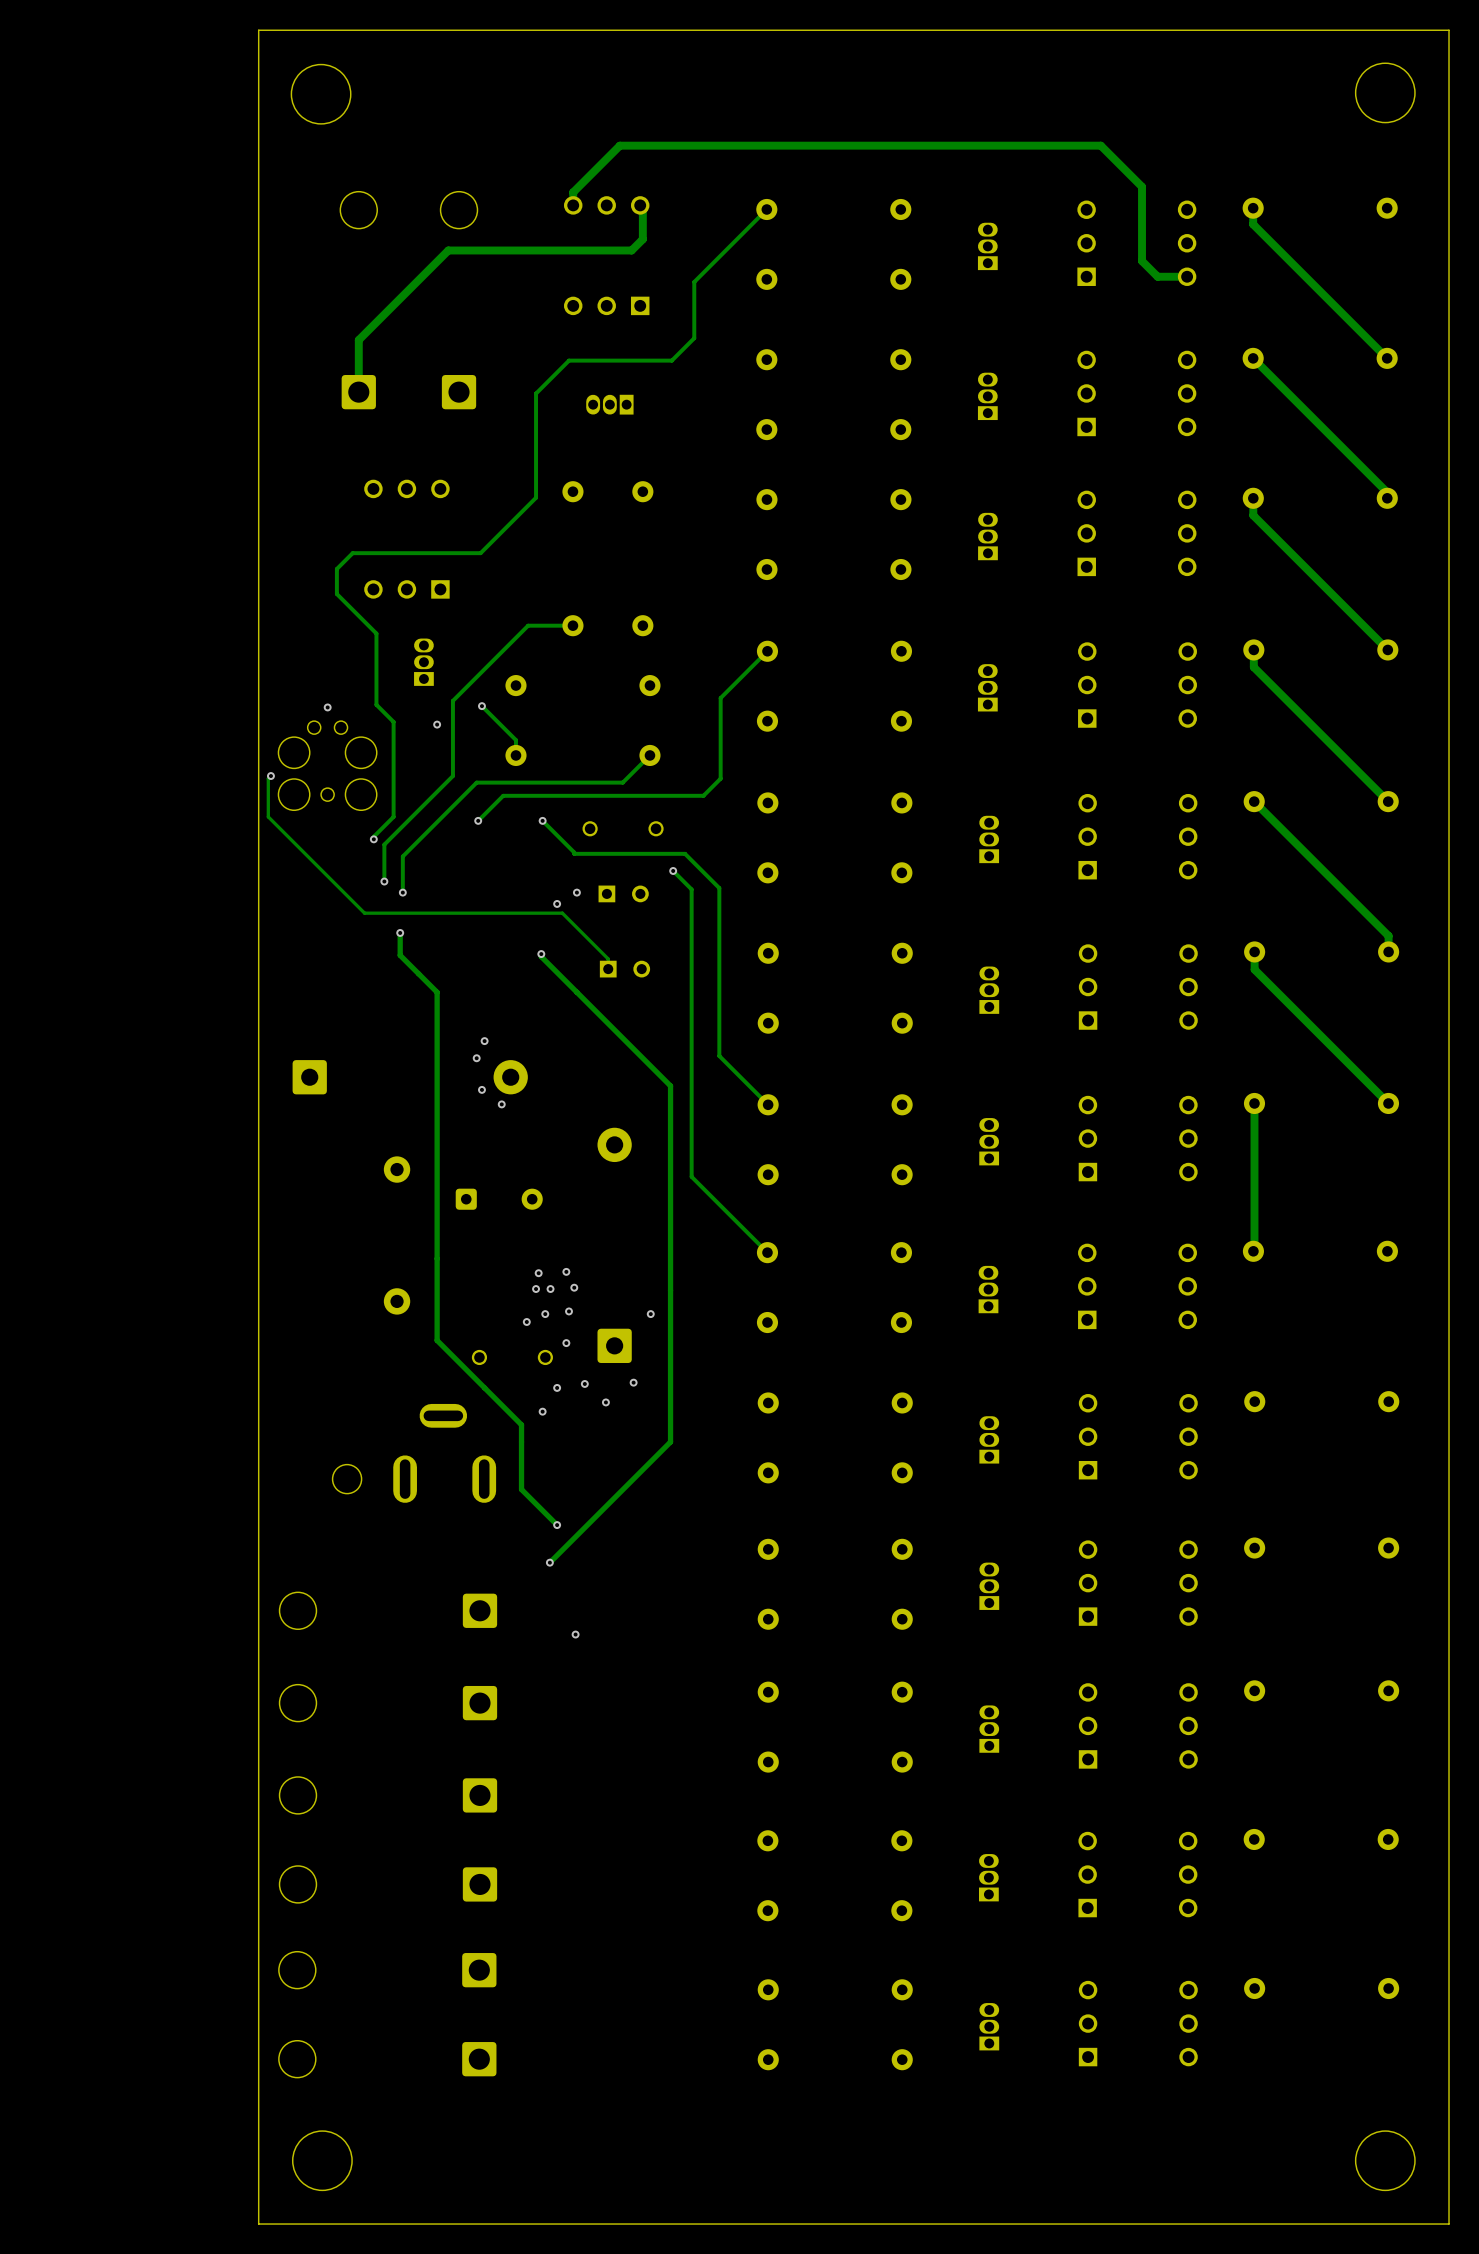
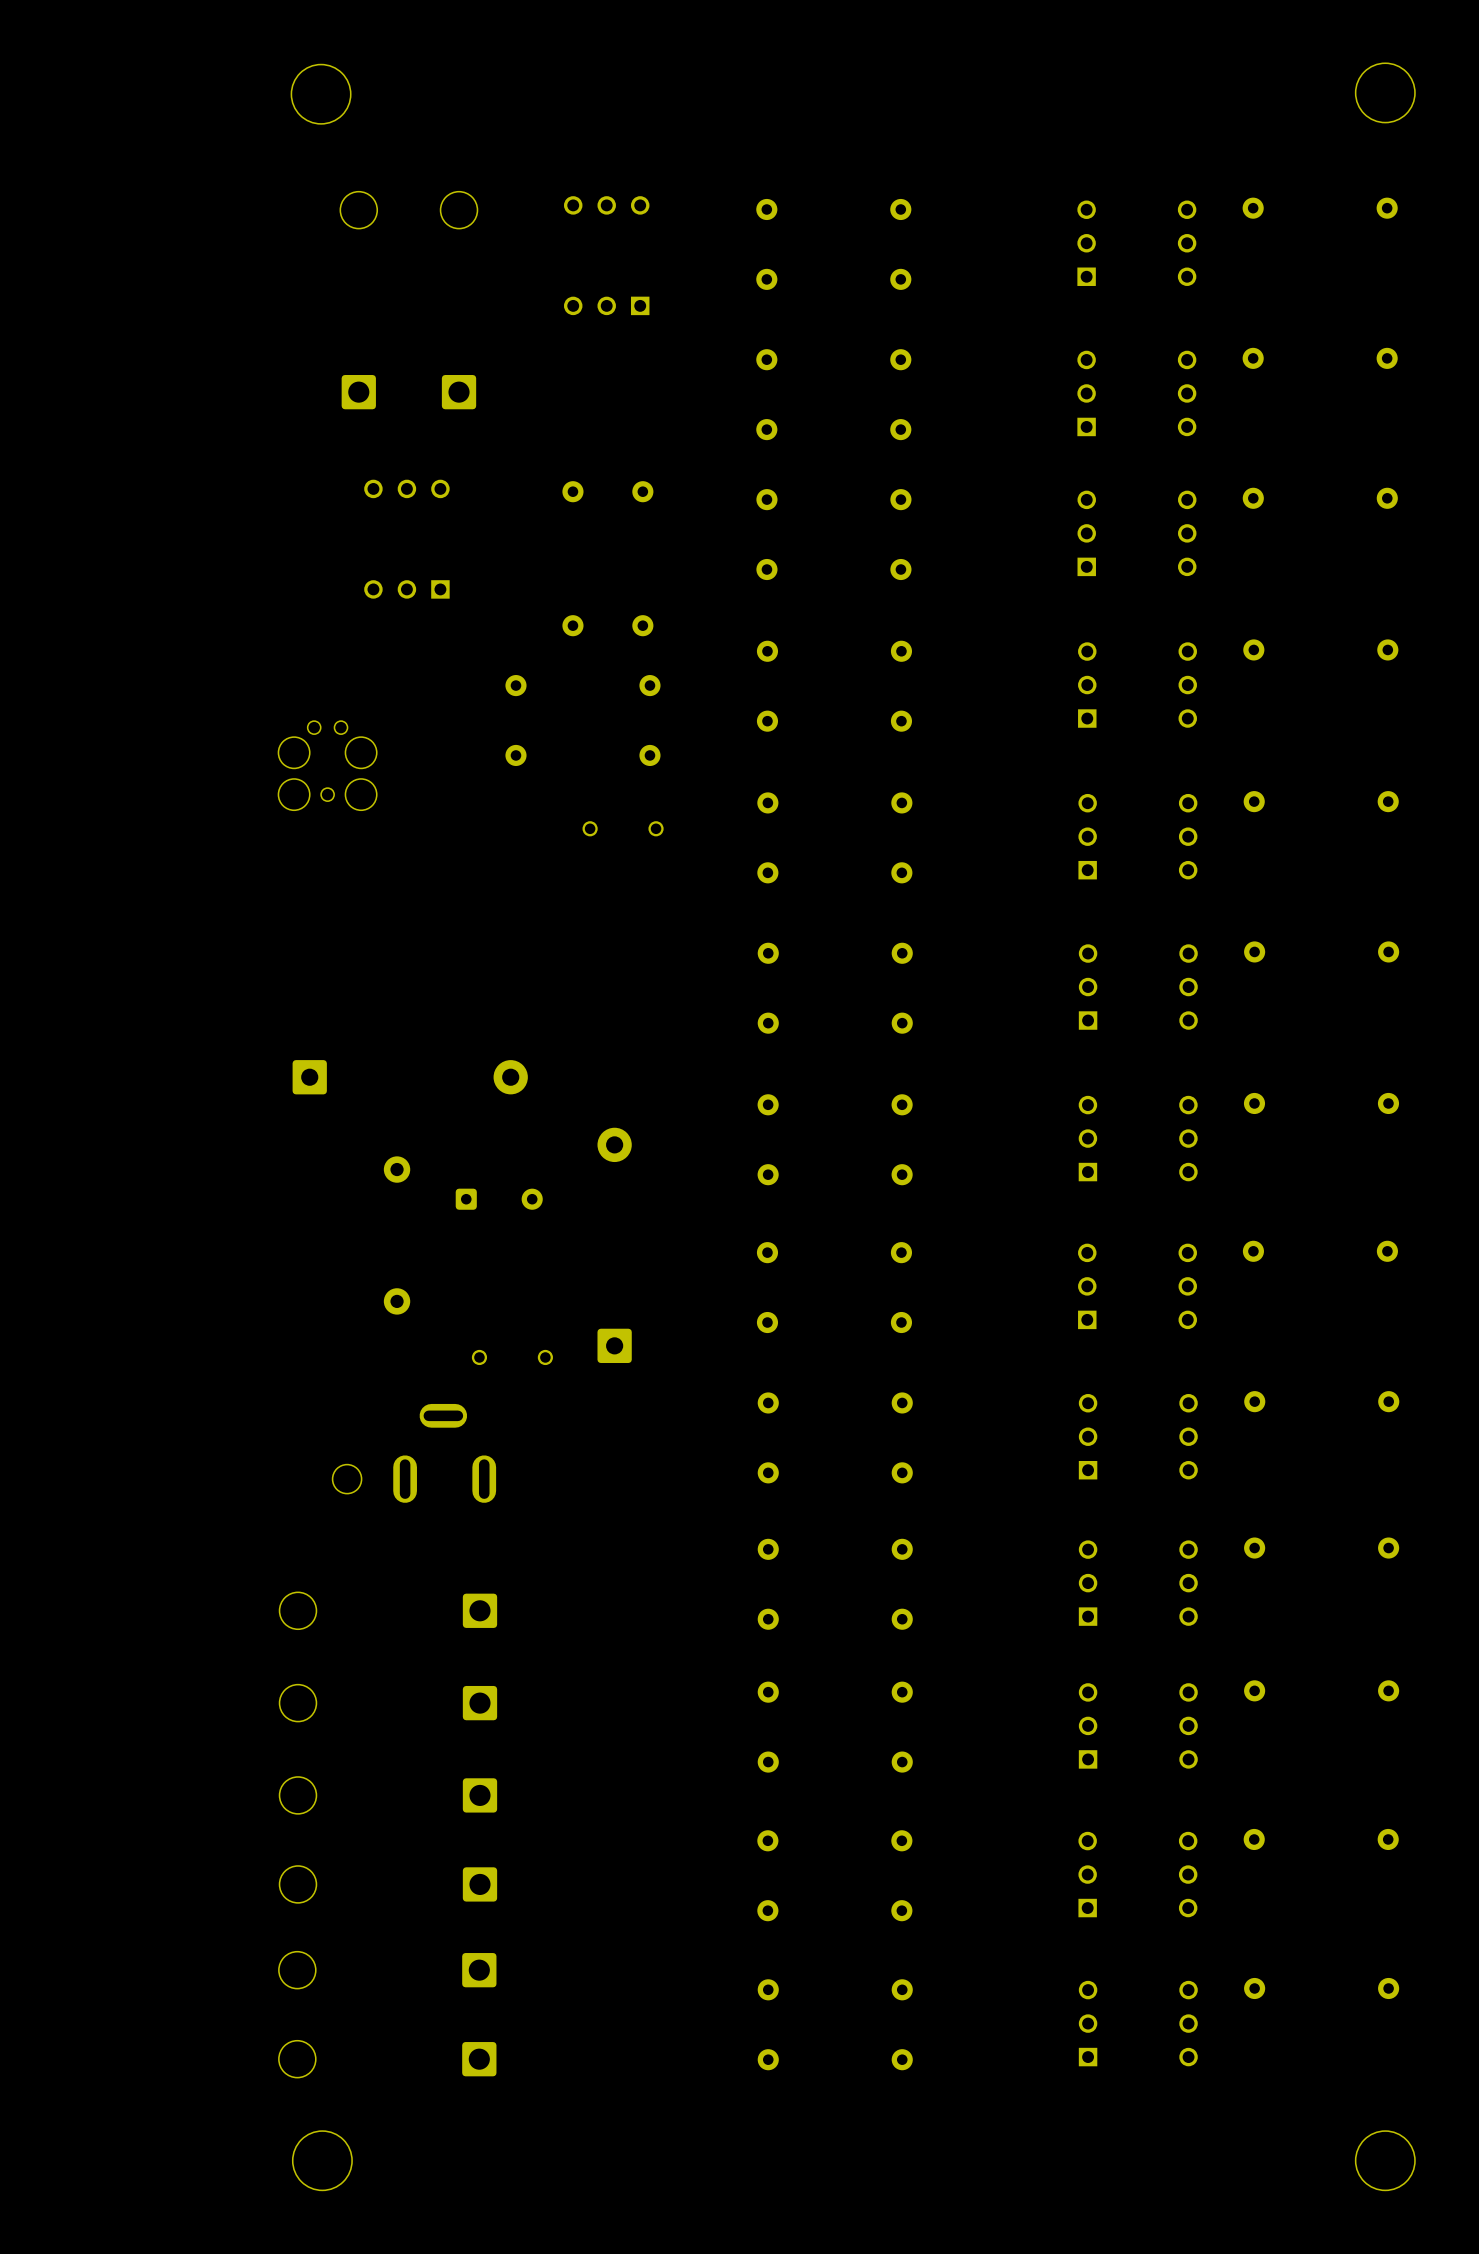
board edge: (1449, 30) (258, 30) (258, 2224) (1449, 2224) (1449, 30) -> none
track: (573, 205) (573, 192) (619, 145) (1100, 145) (1142, 186) (1142, 261) (1157, 276) (1187, 276) -> none
track: (640, 205) (642, 208) (642, 239) (631, 250) (448, 250) (358, 340) (358, 392) -> none
track: (1253, 208) (1253, 224) (1387, 358) -> none
track: (766, 209) (694, 282) (694, 338) (671, 360) (569, 360) (536, 393) (536, 497) (480, 553) (352, 553) (336, 568) (336, 594) (376, 633) (376, 704) (393, 721) (393, 816) (373, 836) (373, 839) -> none
part: (987, 246) -> none
track: (1253, 358) (1387, 492) (1387, 498) -> none
part: (987, 396) -> none
part: (609, 404) -> none
track: (1253, 498) (1253, 515) (1387, 649) -> none
part: (987, 536) -> none
track: (572, 625) (528, 625) (452, 700) (452, 776) (384, 844) (384, 881) -> none
track: (1253, 649) (1253, 667) (1388, 801) -> none
track: (767, 651) (720, 698) (720, 778) (703, 795) (503, 795) (478, 820) -> none
part: (423, 662) -> none
part: (987, 687) -> none
track: (481, 706) (515, 740) (515, 755) -> none
via: (481, 706) -> none
via: (327, 707) -> none
via: (437, 724) -> none
track: (649, 755) (622, 782) (476, 782) (402, 856) (402, 892) -> none
track: (270, 776) (268, 778) (268, 816) (364, 913) (562, 913) (608, 959) (608, 969) -> none
via: (270, 776) -> none
track: (1254, 801) (1388, 935) (1388, 951) -> none
via: (478, 820) -> none
track: (542, 820) (574, 853) (685, 853) (719, 888) (719, 1056) (768, 1104) -> none
via: (542, 820) -> none
via: (373, 839) -> none
part: (989, 839) -> none
track: (673, 870) (691, 889) (691, 1176) (767, 1252) -> none
via: (673, 870) -> none
via: (384, 881) -> none
via: (402, 892) -> none
via: (576, 892) -> none
part: (623, 893) -> none
via: (557, 903) -> none
track: (400, 932) (400, 955) (437, 992) (437, 1340) (521, 1424) (521, 1489) (557, 1525) -> none
via: (400, 932) -> none
track: (1254, 951) (1254, 969) (1388, 1103) -> none
track: (541, 954) (541, 956) (670, 1085) (670, 1442) (549, 1562) -> none
via: (541, 954) -> none
part: (624, 969) -> none
part: (989, 990) -> none
via: (484, 1041) -> none
via: (476, 1058) -> none
via: (481, 1089) -> none
track: (1254, 1103) (1253, 1251) -> none
via: (501, 1104) -> none
part: (989, 1141) -> none
via: (566, 1271) -> none
via: (538, 1273) -> none
via: (574, 1287) -> none
via: (536, 1289) -> none
via: (550, 1289) -> none
part: (988, 1289) -> none
via: (569, 1311) -> none
via: (545, 1314) -> none
via: (650, 1314) -> none
via: (526, 1321) -> none
via: (566, 1343) -> none
via: (633, 1382) -> none
via: (584, 1383) -> none
via: (557, 1387) -> none
via: (605, 1402) -> none
via: (542, 1411) -> none
part: (989, 1439) -> none
via: (557, 1525) -> none
via: (549, 1562) -> none
part: (989, 1586) -> none
via: (575, 1634) -> none
part: (989, 1729) -> none
part: (988, 1877) -> none
part: (989, 2026) -> none

